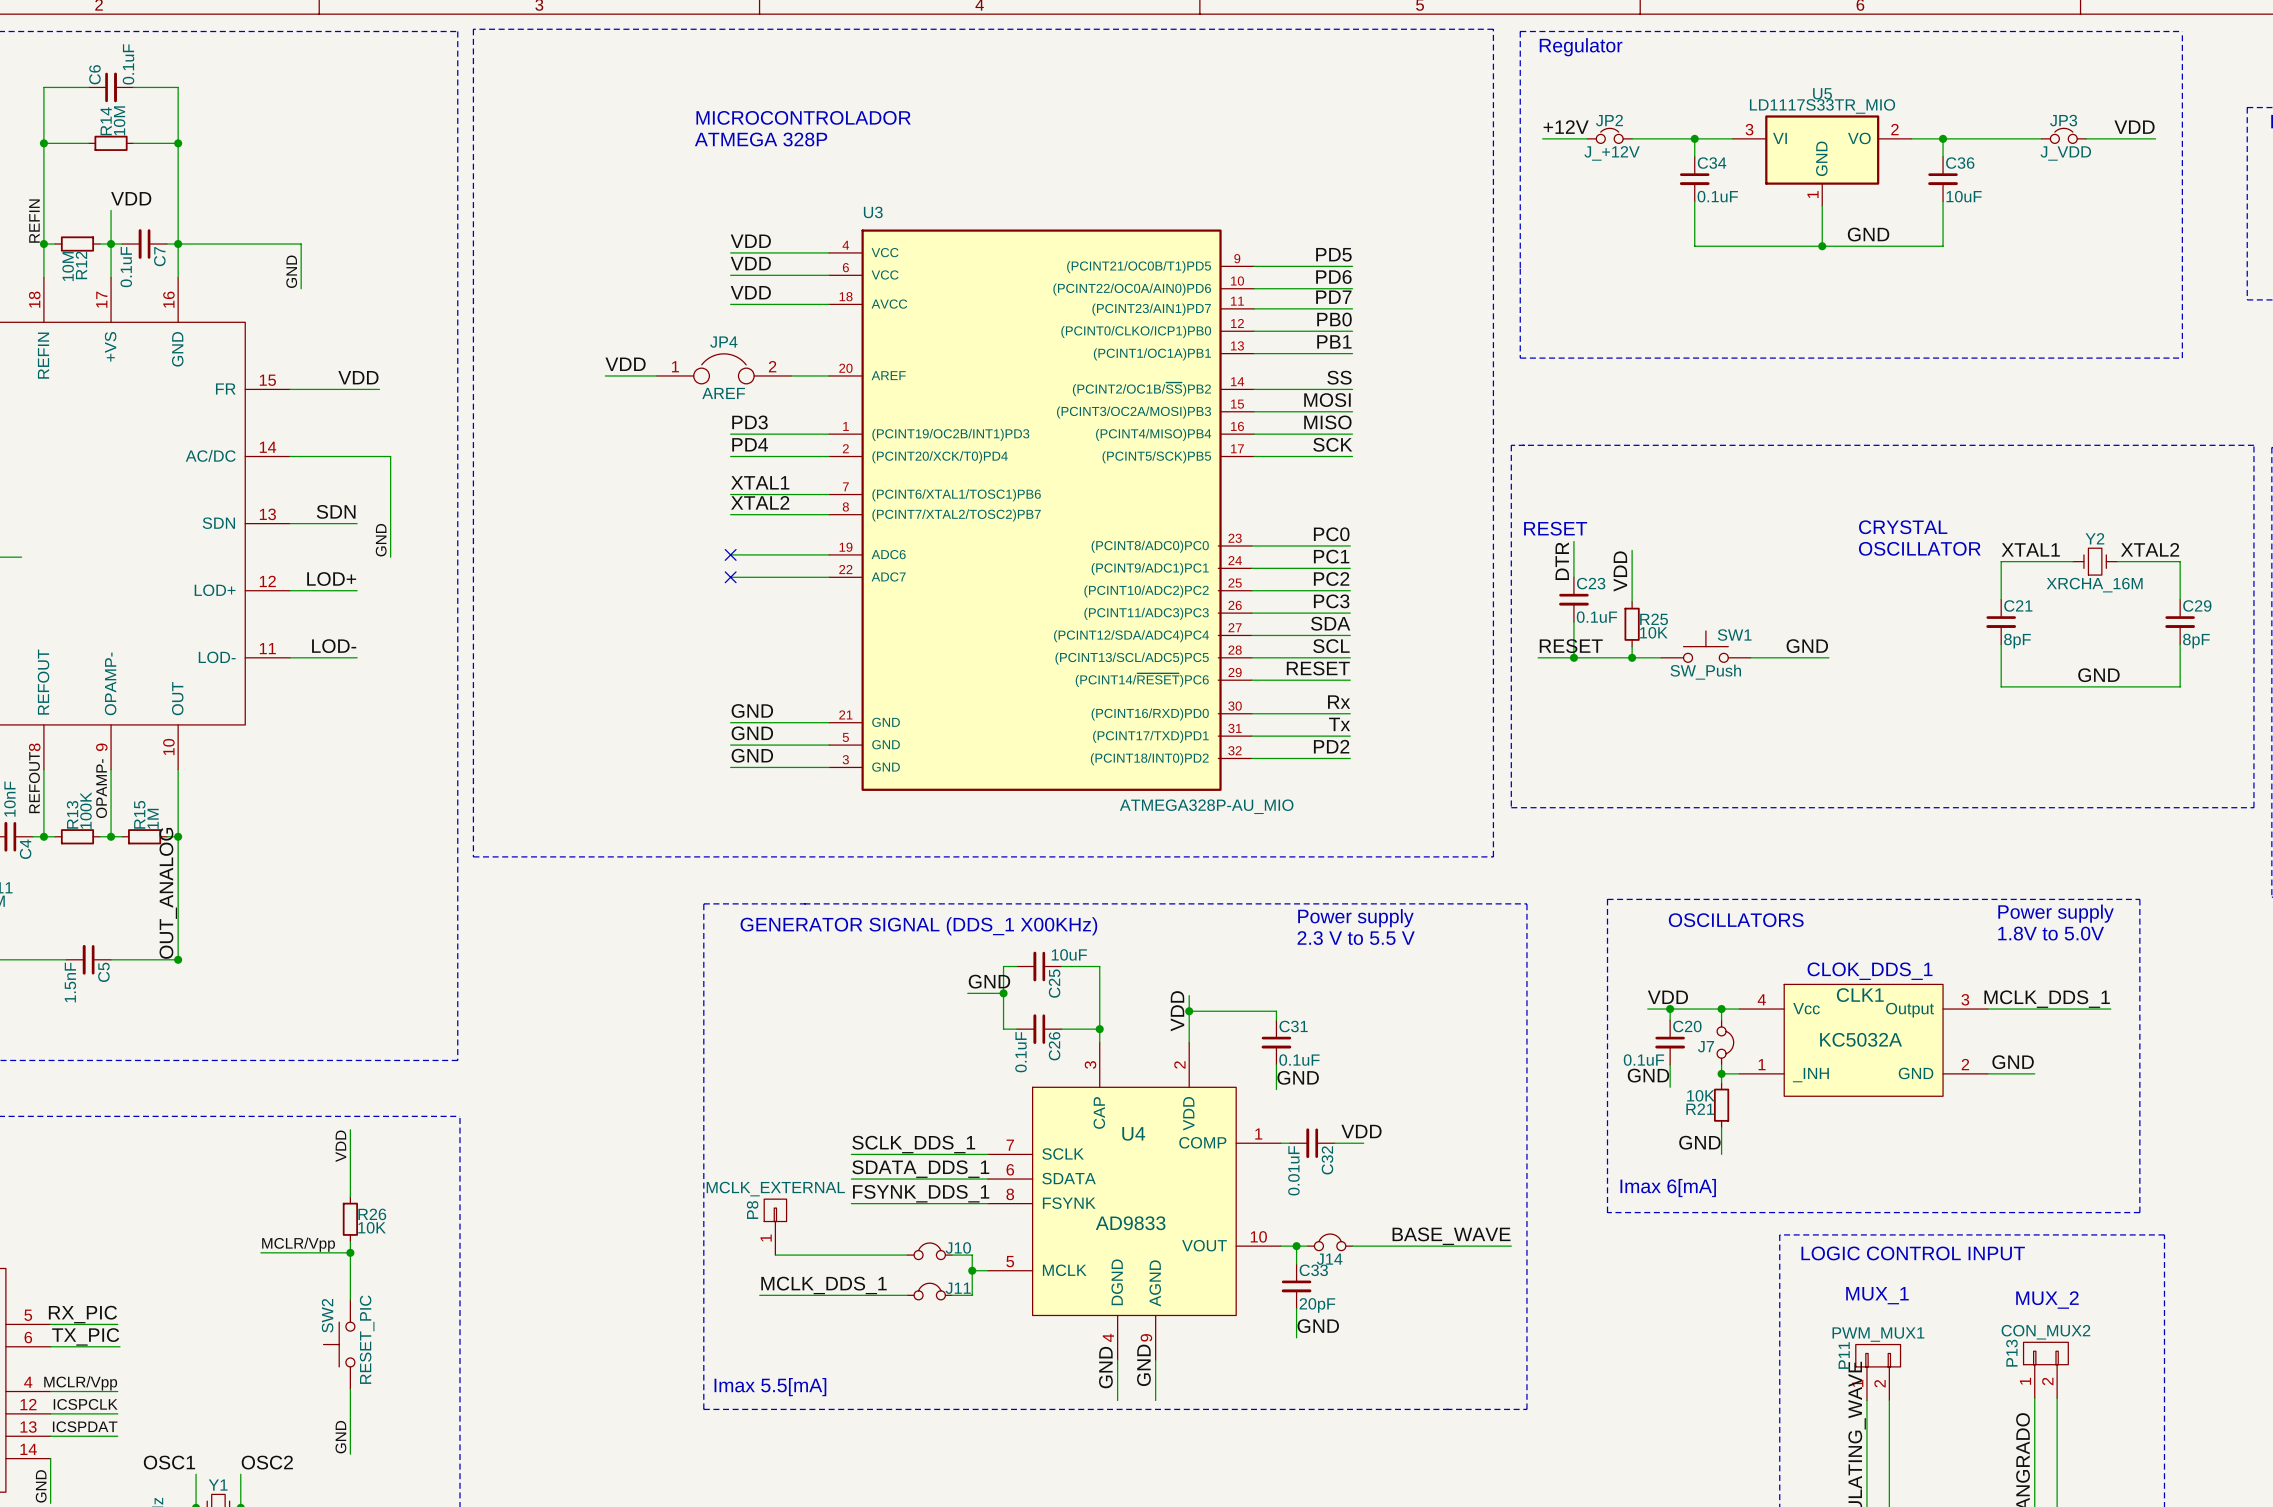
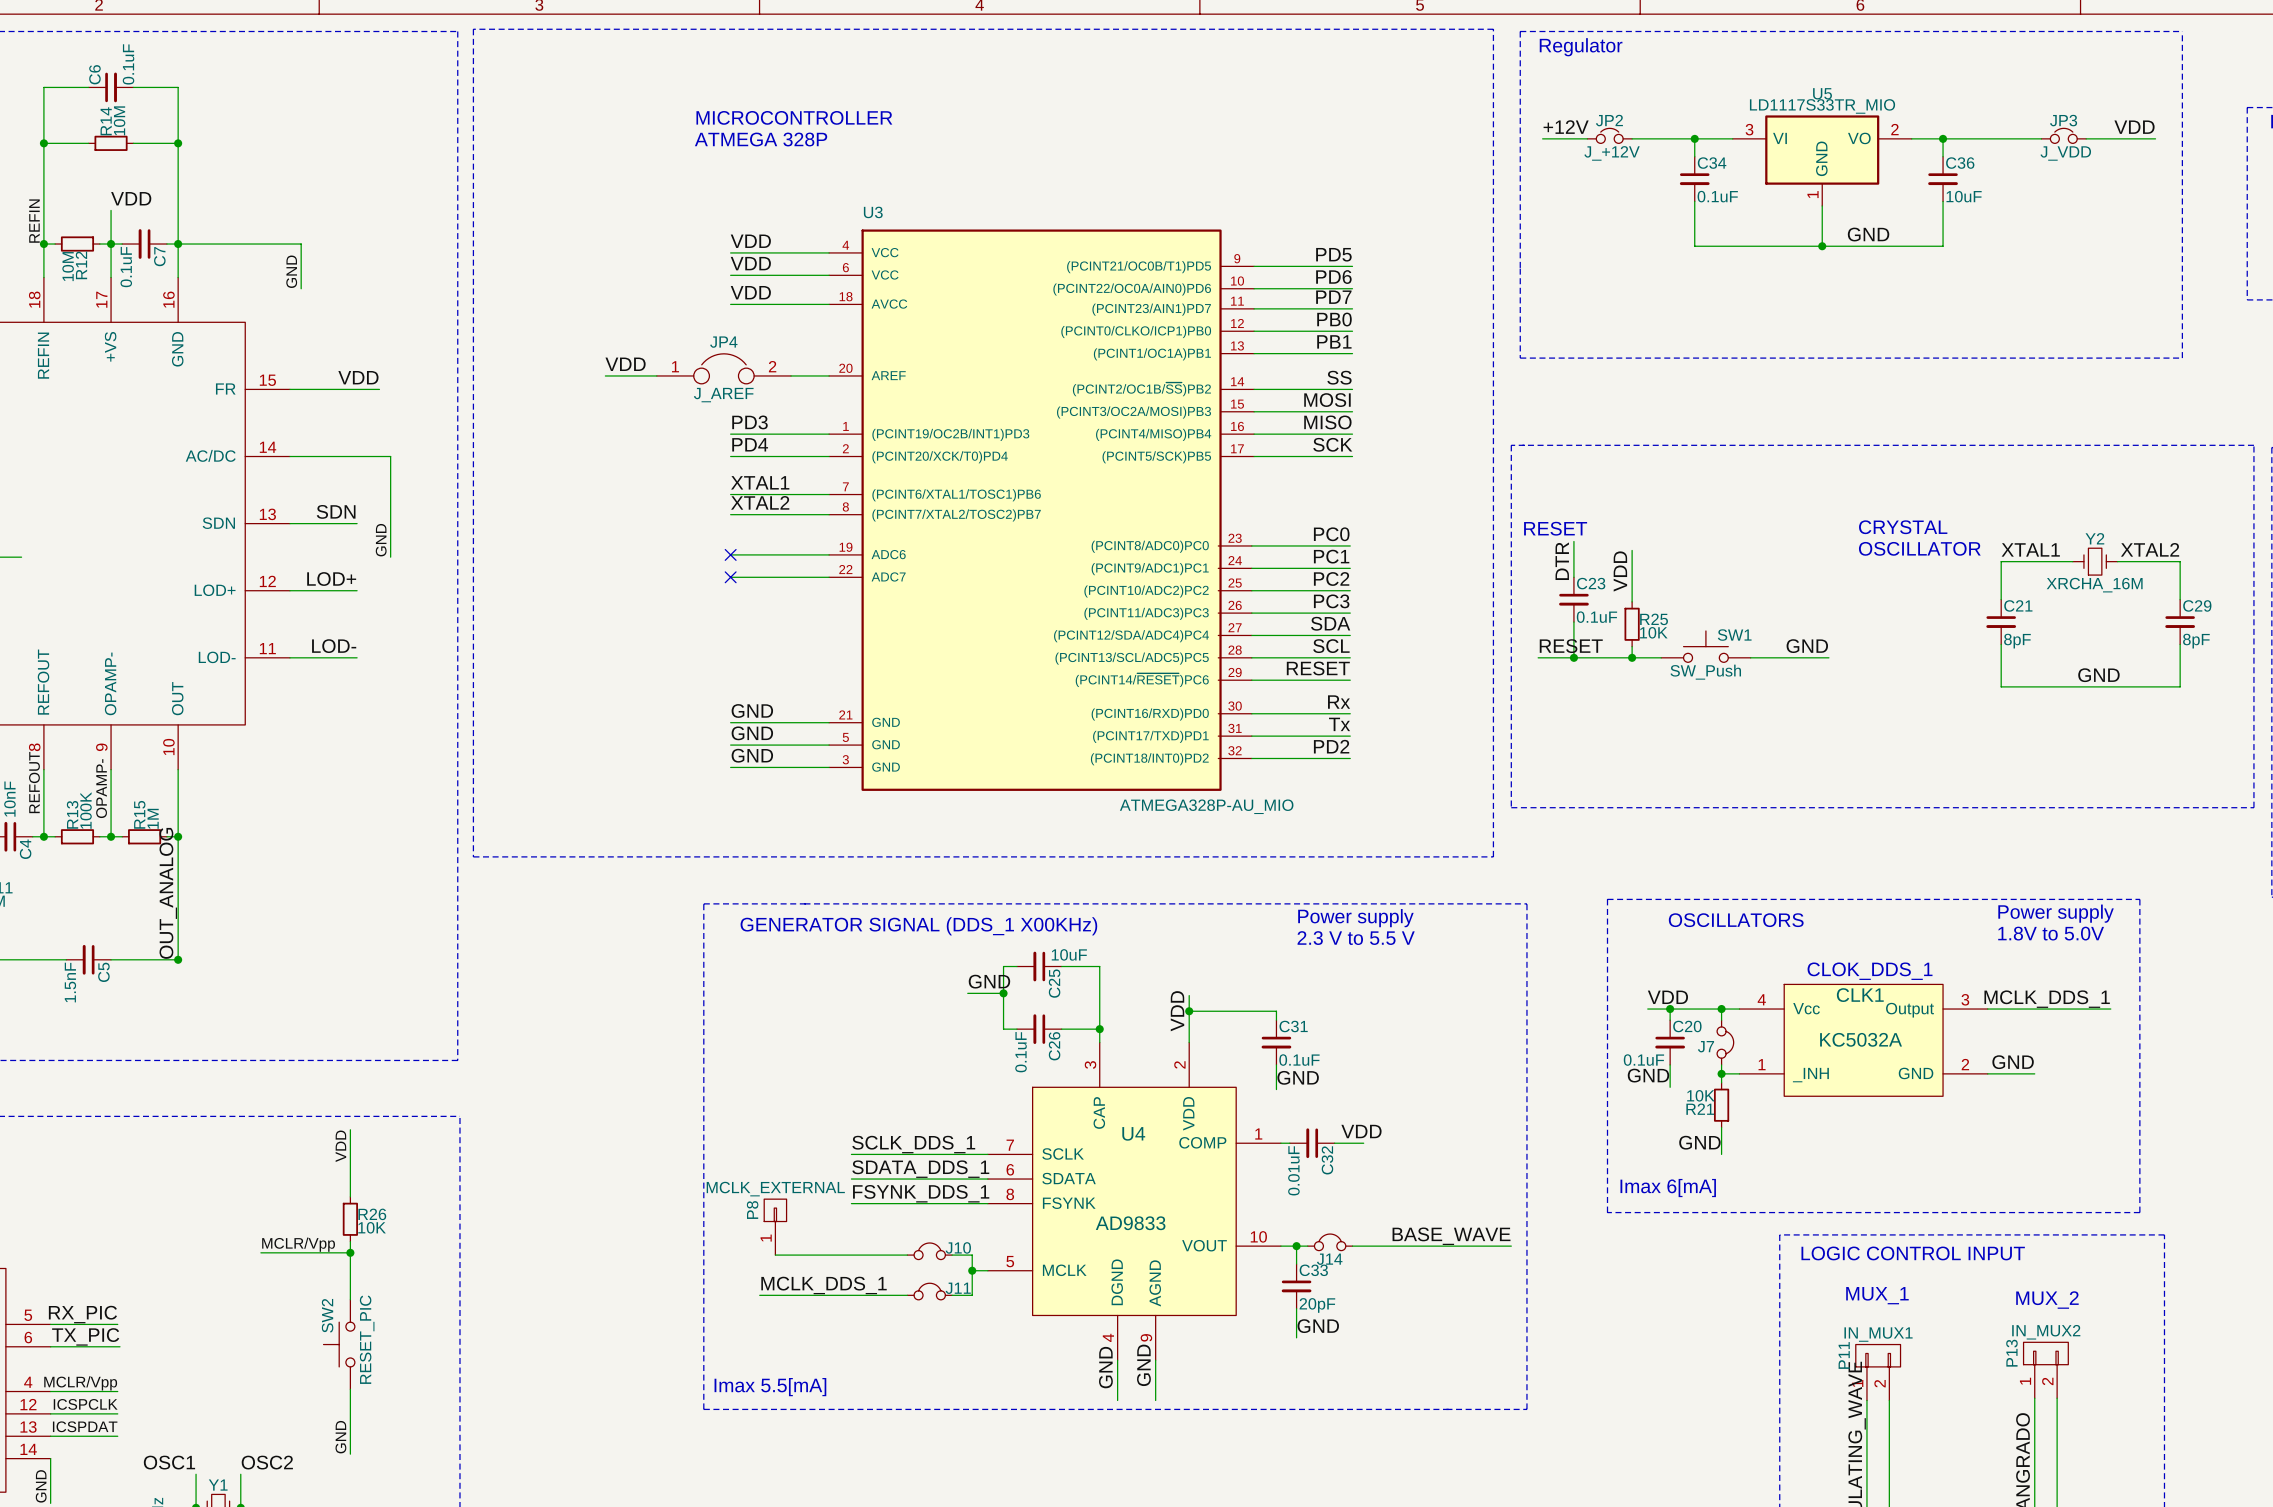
text: MICROCONTROLADOR (803, 117) -> MICROCONTROLLER (794, 117)
JP4 value: AREF (723, 393) -> J_AREF (723, 395)
P13 value: CON_MUX2 (2045, 1332) -> IN_MUX2 (2046, 1332)
P11 value: PWM_MUX1 (1878, 1334) -> IN_MUX1 (1878, 1334)

